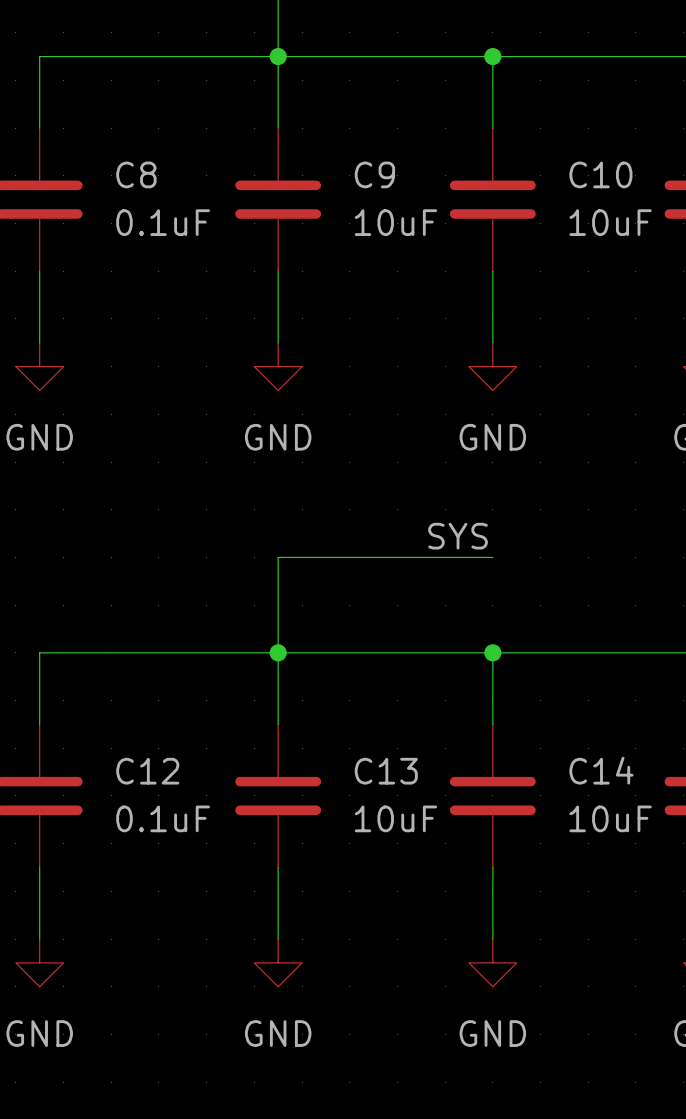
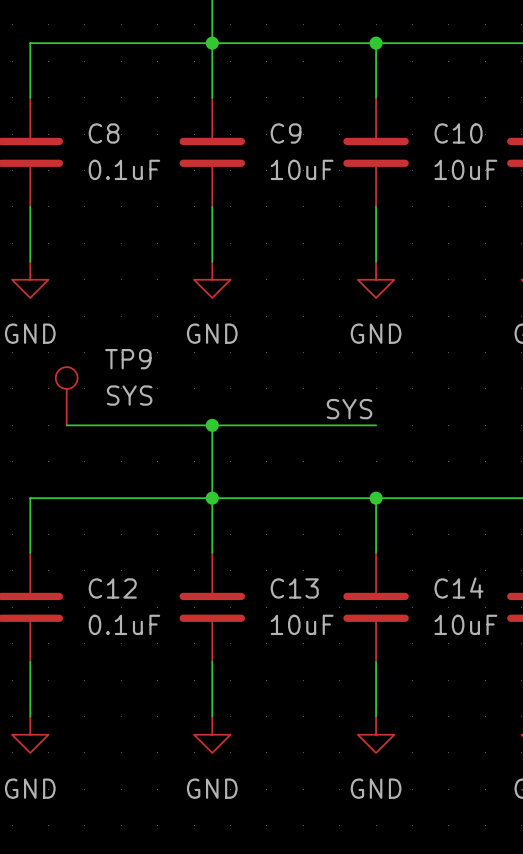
TP9: none -> SYS (66, 396)
wire: none -> (66, 425) (212, 425)
junction: none -> (212, 425)

